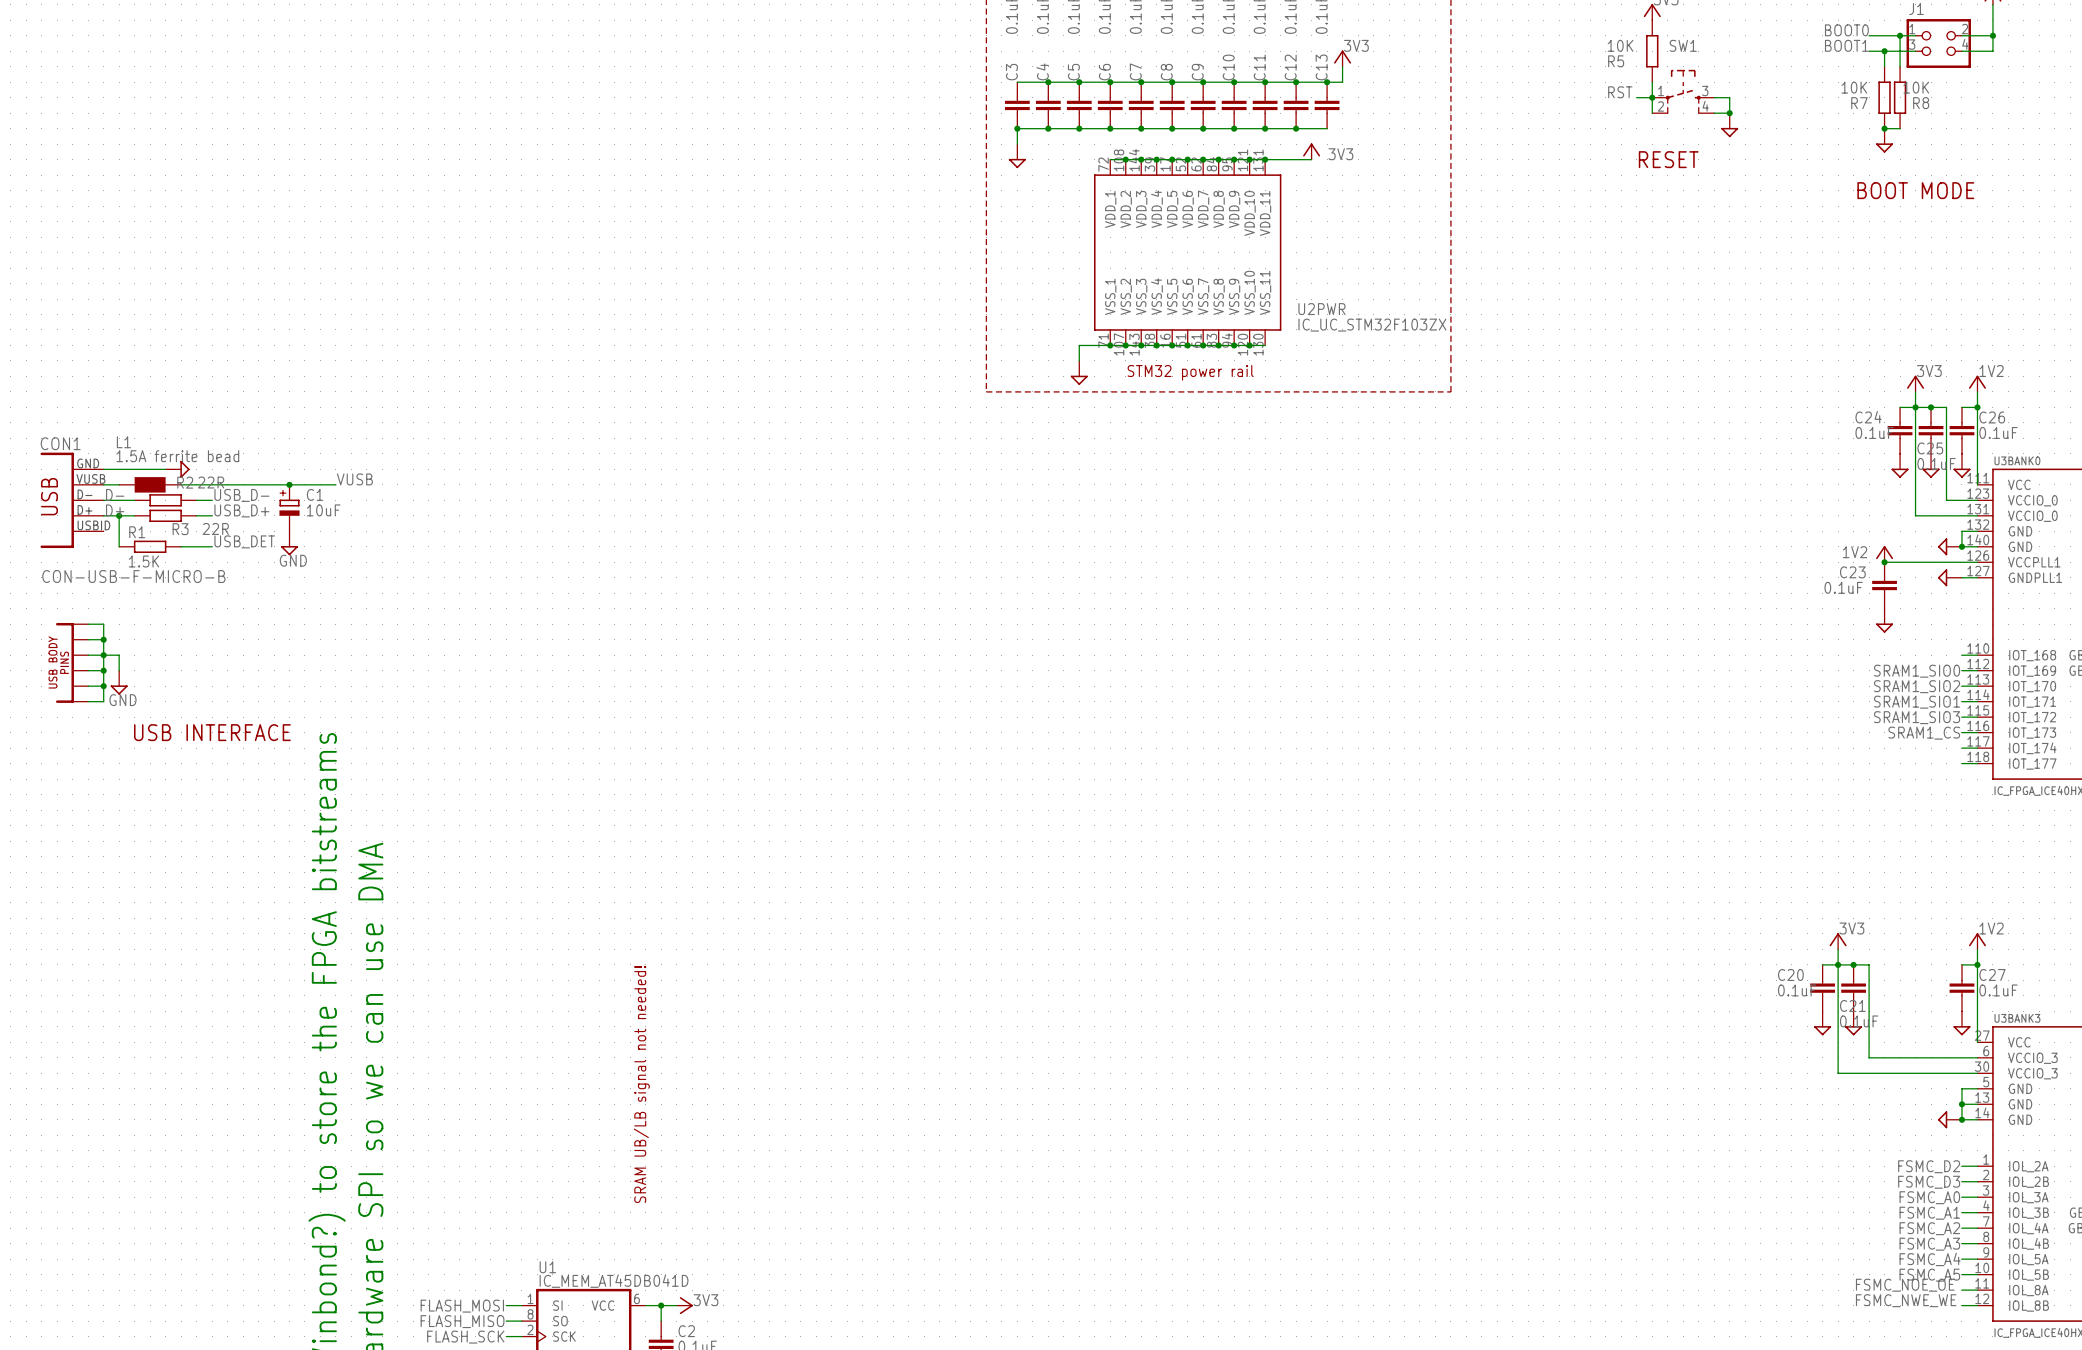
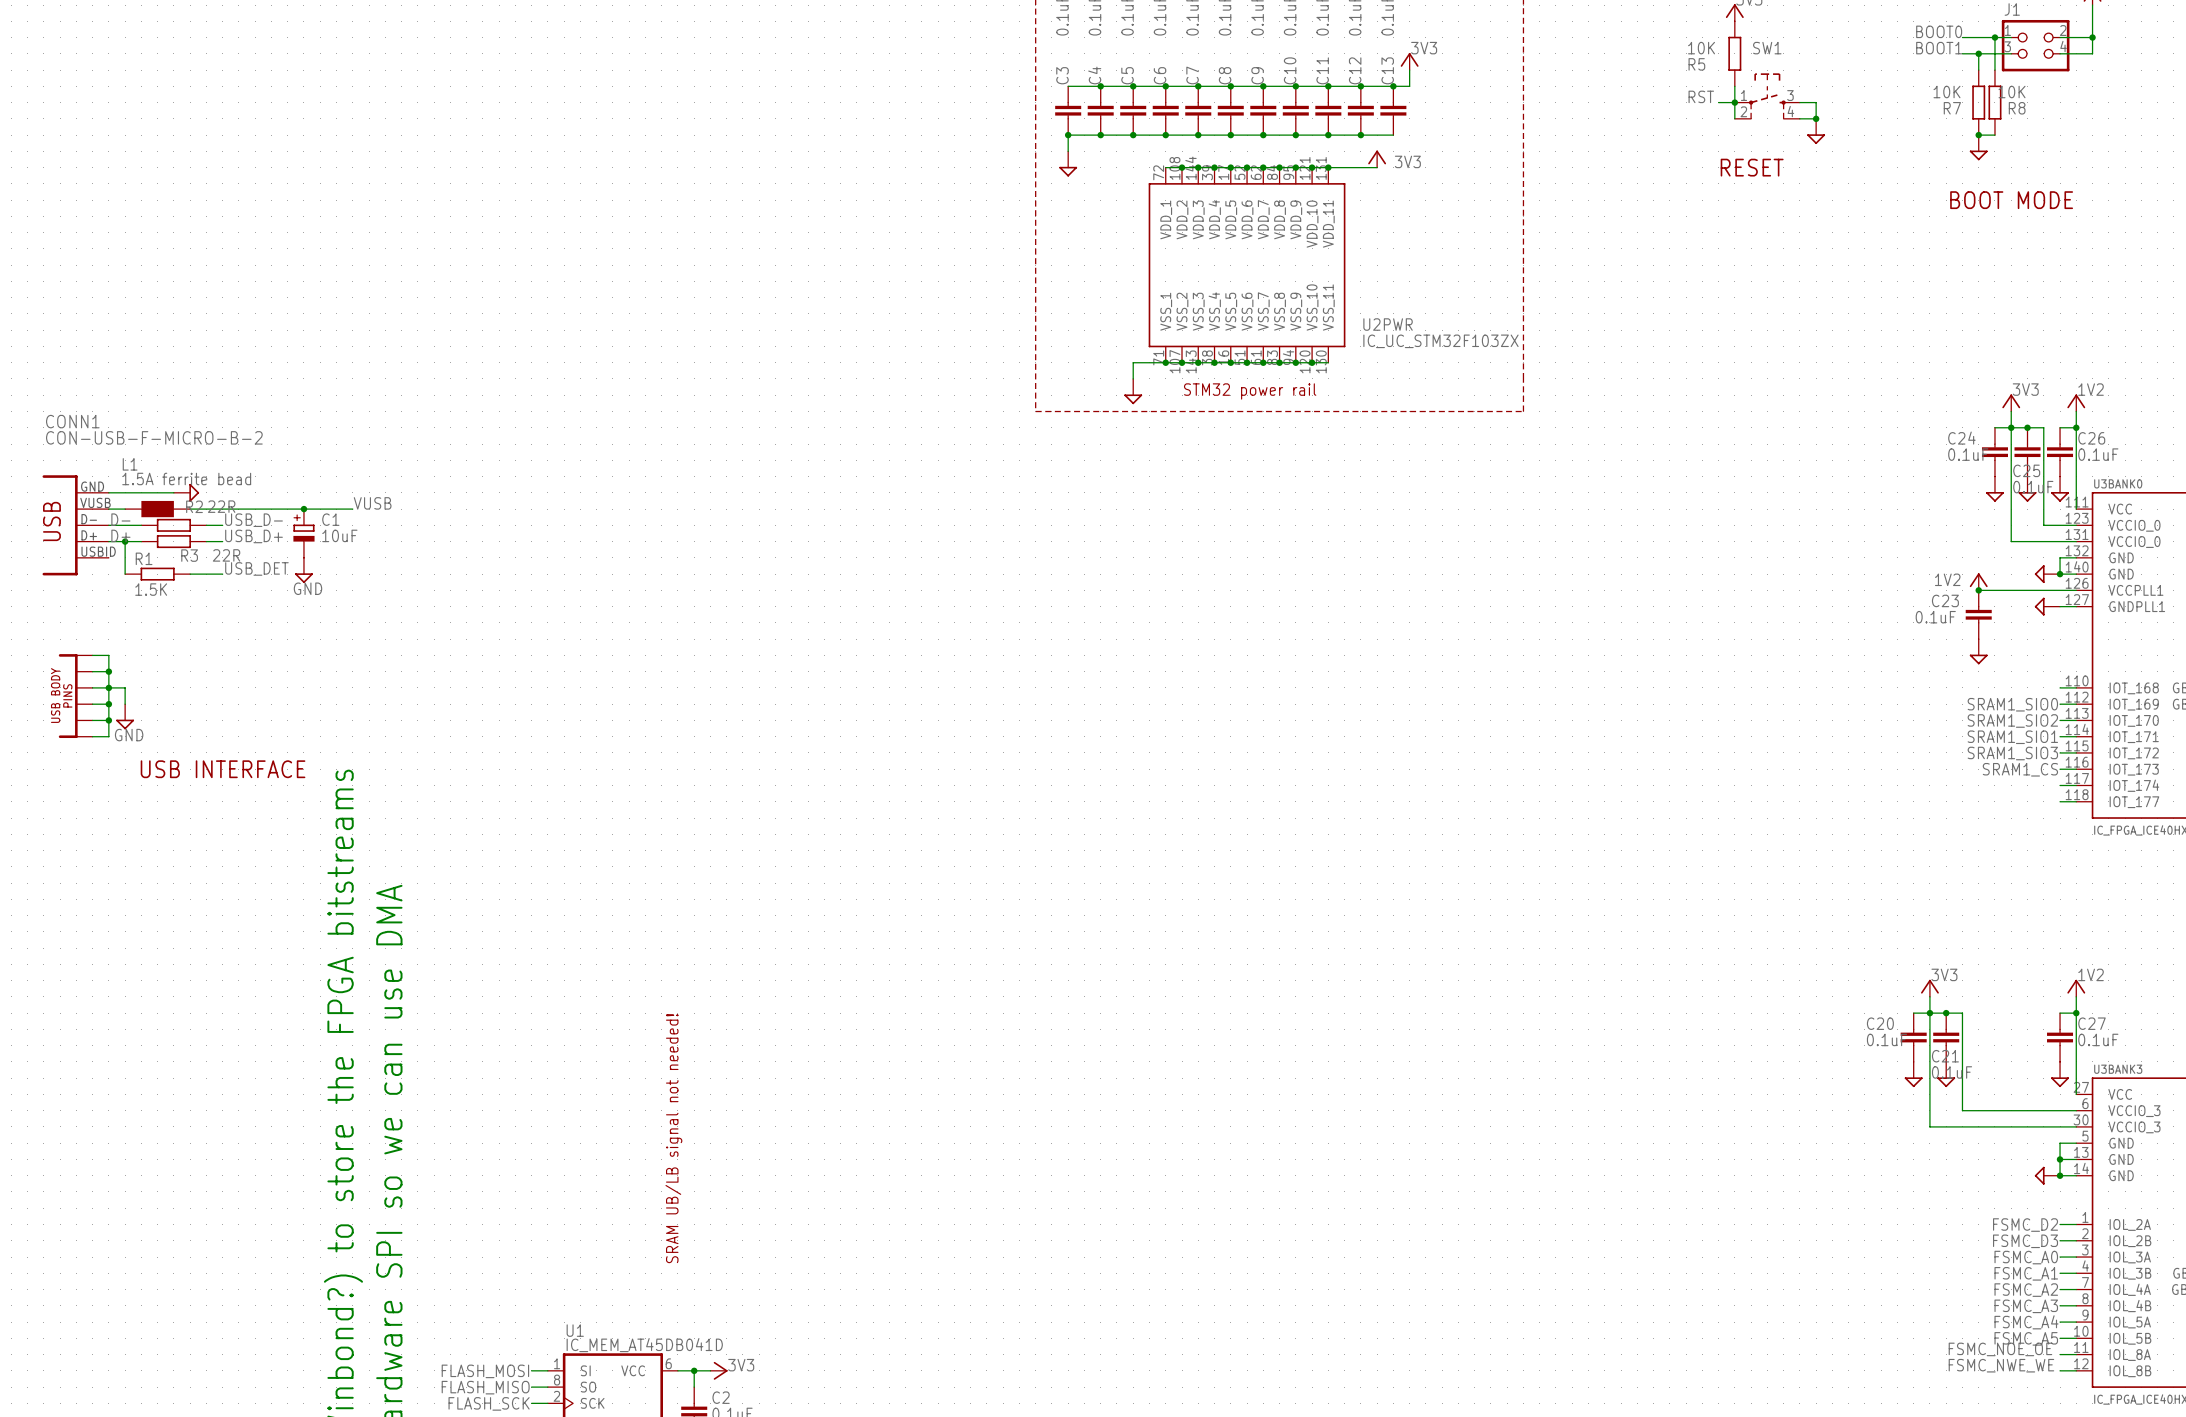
CON1 name: CON1 (60, 443) -> CONN1 (72, 421)
CON1 value: CON-USB-F-MICRO-B (133, 576) -> CON-USB-F-MICRO-B-2 (154, 437)

